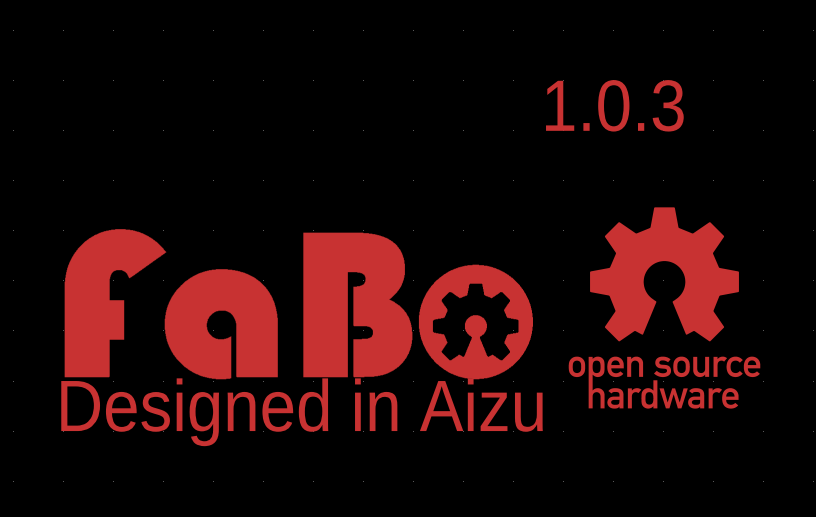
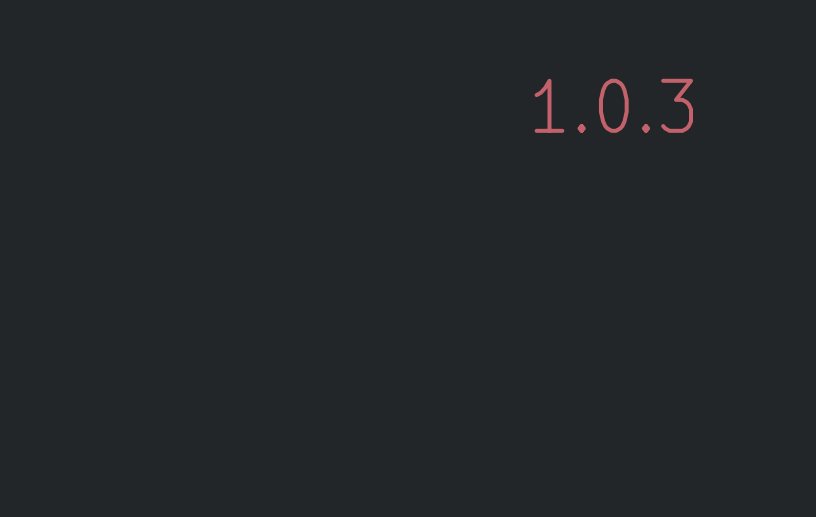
part: (298, 304) -> none
part: (664, 307) -> none

